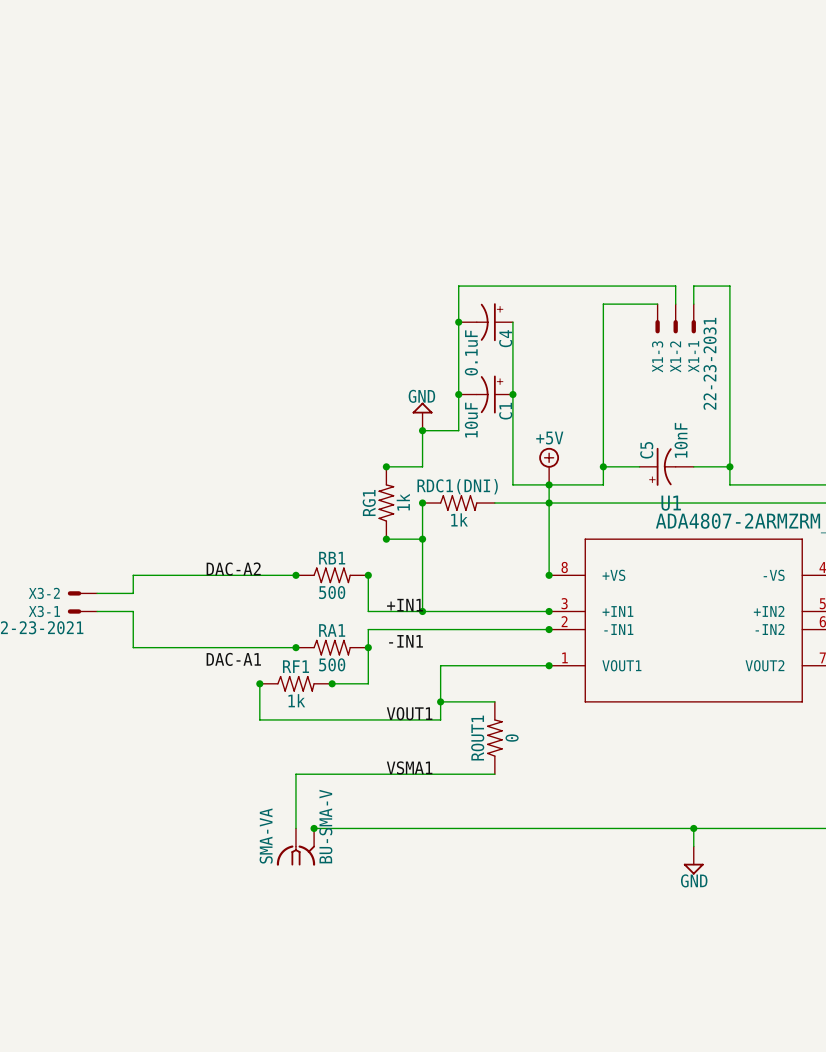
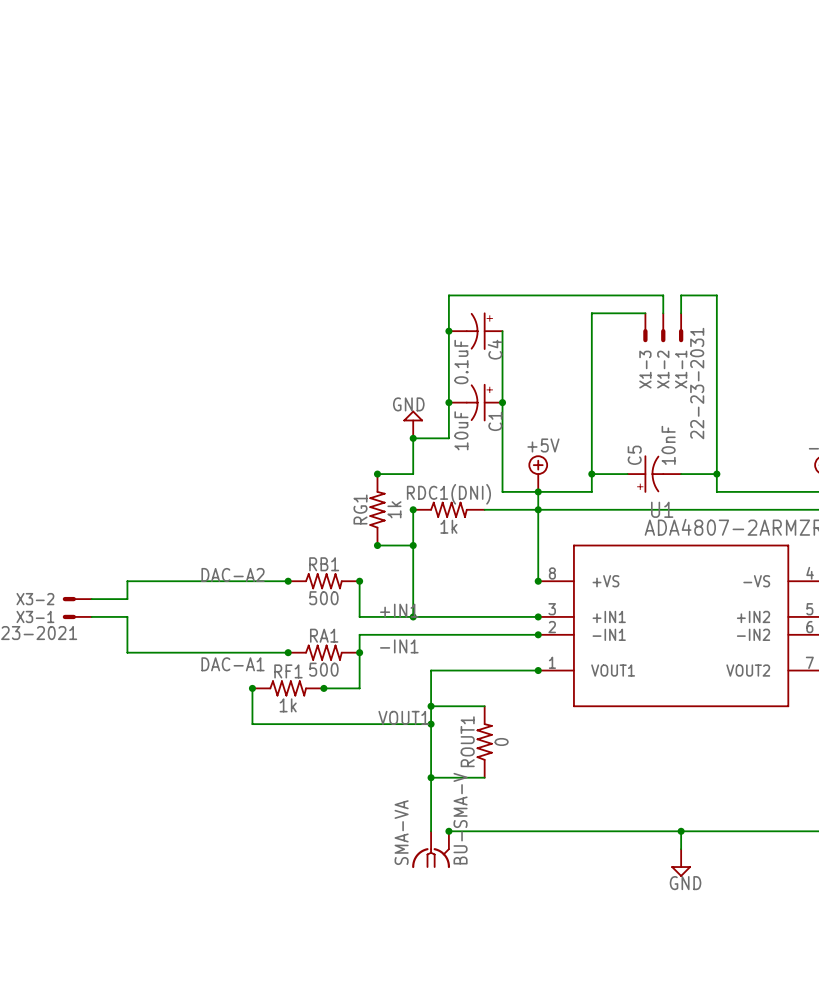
wire: none -> (431, 724) (431, 831)
junction: none -> (431, 724)
label: VSMA1 (409, 767) -> none
wire: (440, 774) (295, 774) (295, 828) -> none
junction: none -> (431, 777)
wire: (314, 828) (458, 828) -> none
junction: (314, 828) -> none
junction: none -> (448, 831)
SMA-VA position: (295, 847) -> (431, 849)

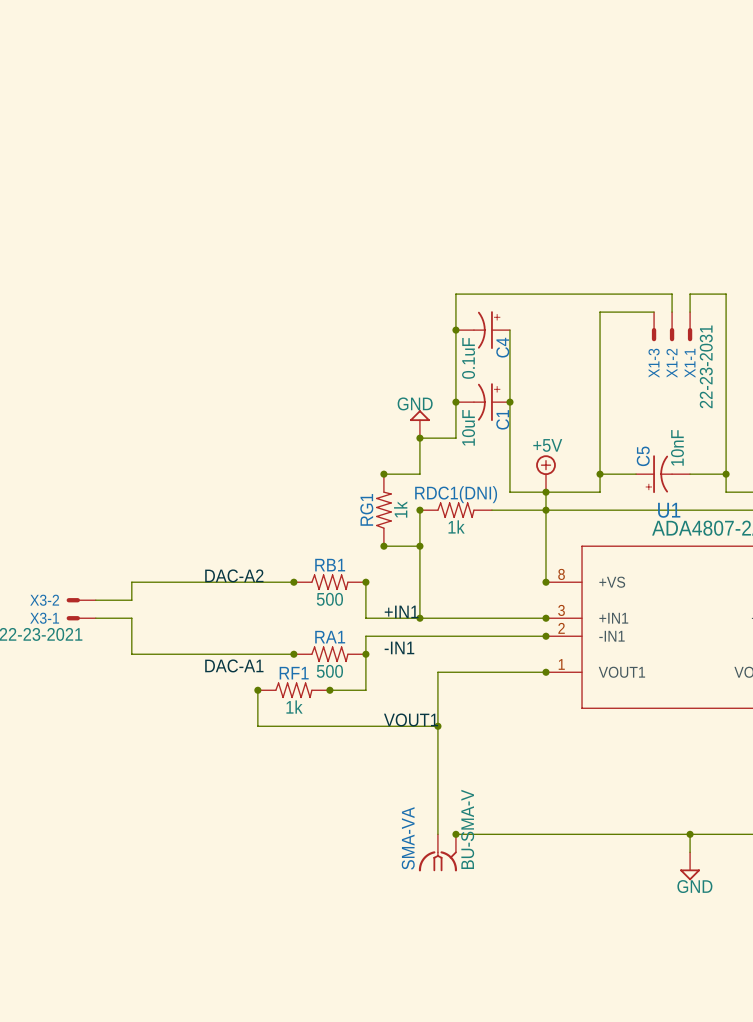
wire: (431, 706) (484, 706) -> none
junction: (431, 706) -> none
ROUT1: 0 (484, 741) -> none
wire: (431, 777) (484, 777) -> none
junction: (431, 777) -> none

